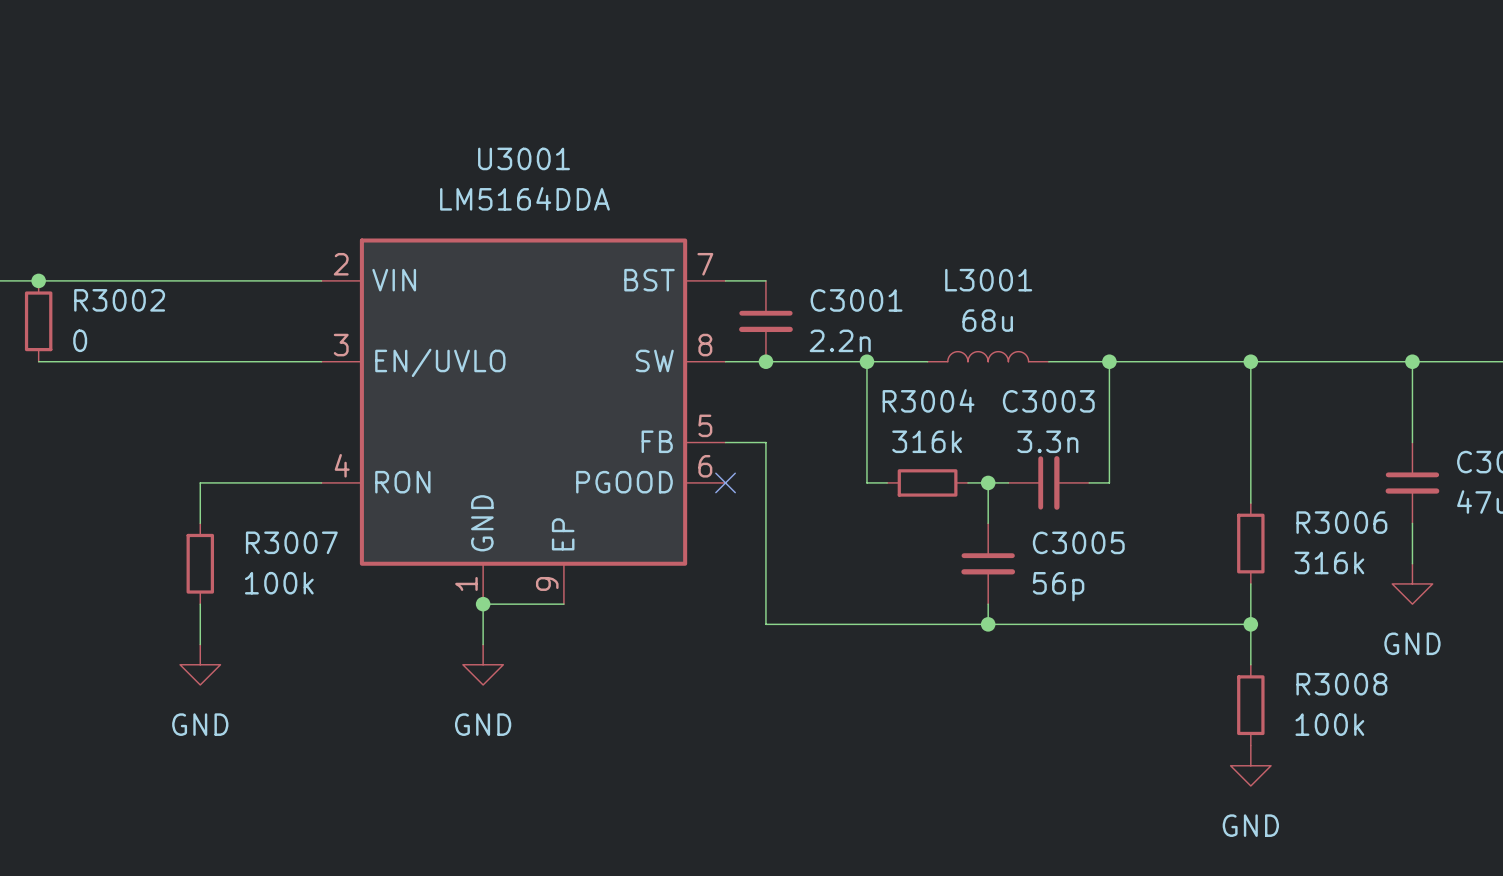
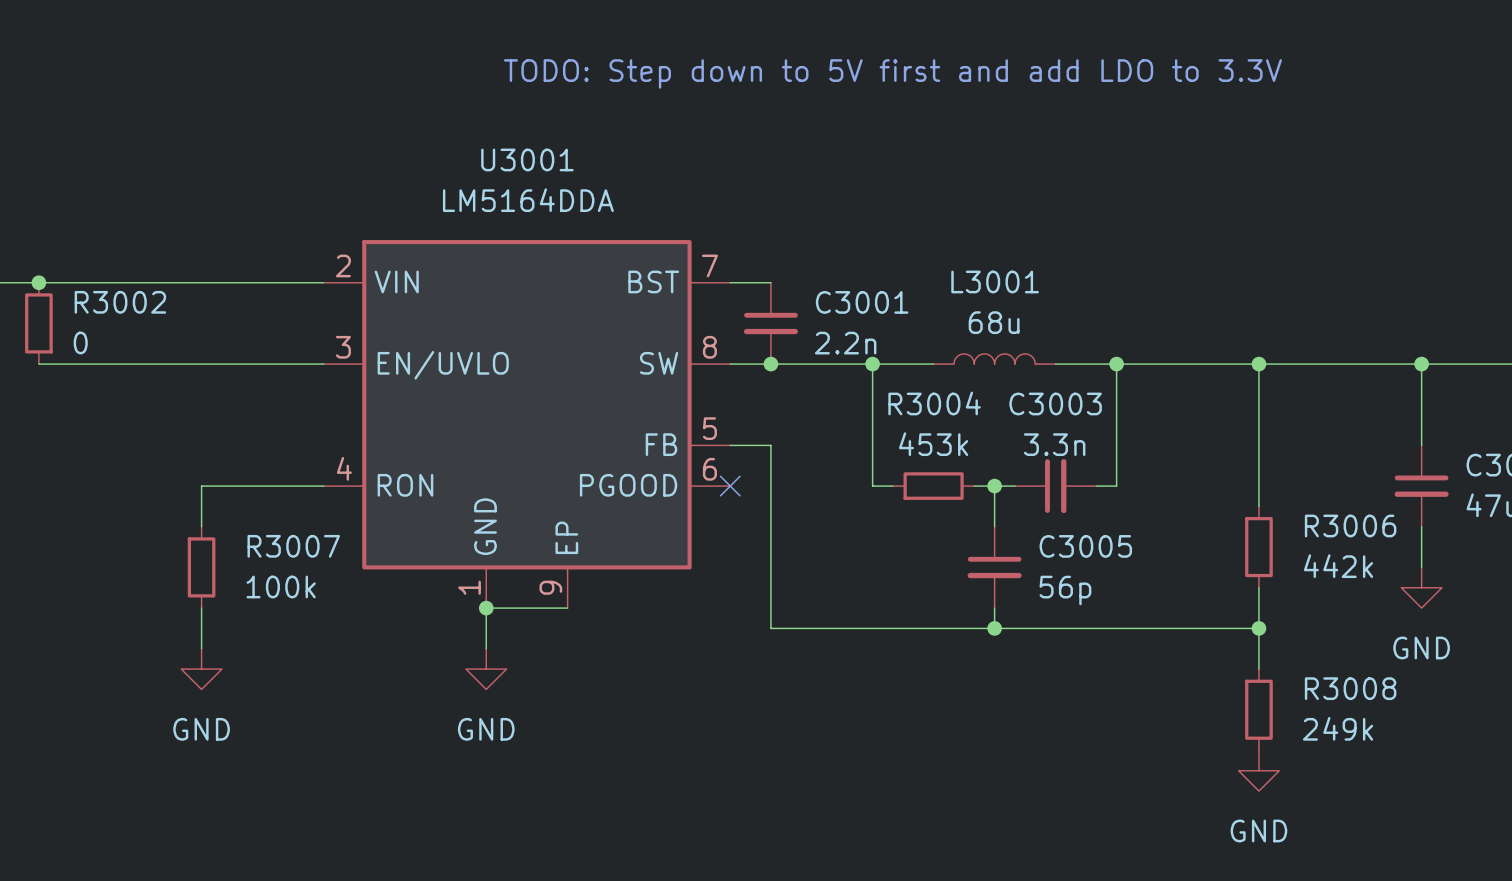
text: none -> TODO: Step down to 5V first and add LDO to 3.3V (892, 73)
R3004 value: 316k (927, 441) -> 453k (933, 444)
R3006 value: 316k (1329, 562) -> 442k (1338, 566)
R3008 value: 100k (1329, 724) -> 249k (1338, 728)

